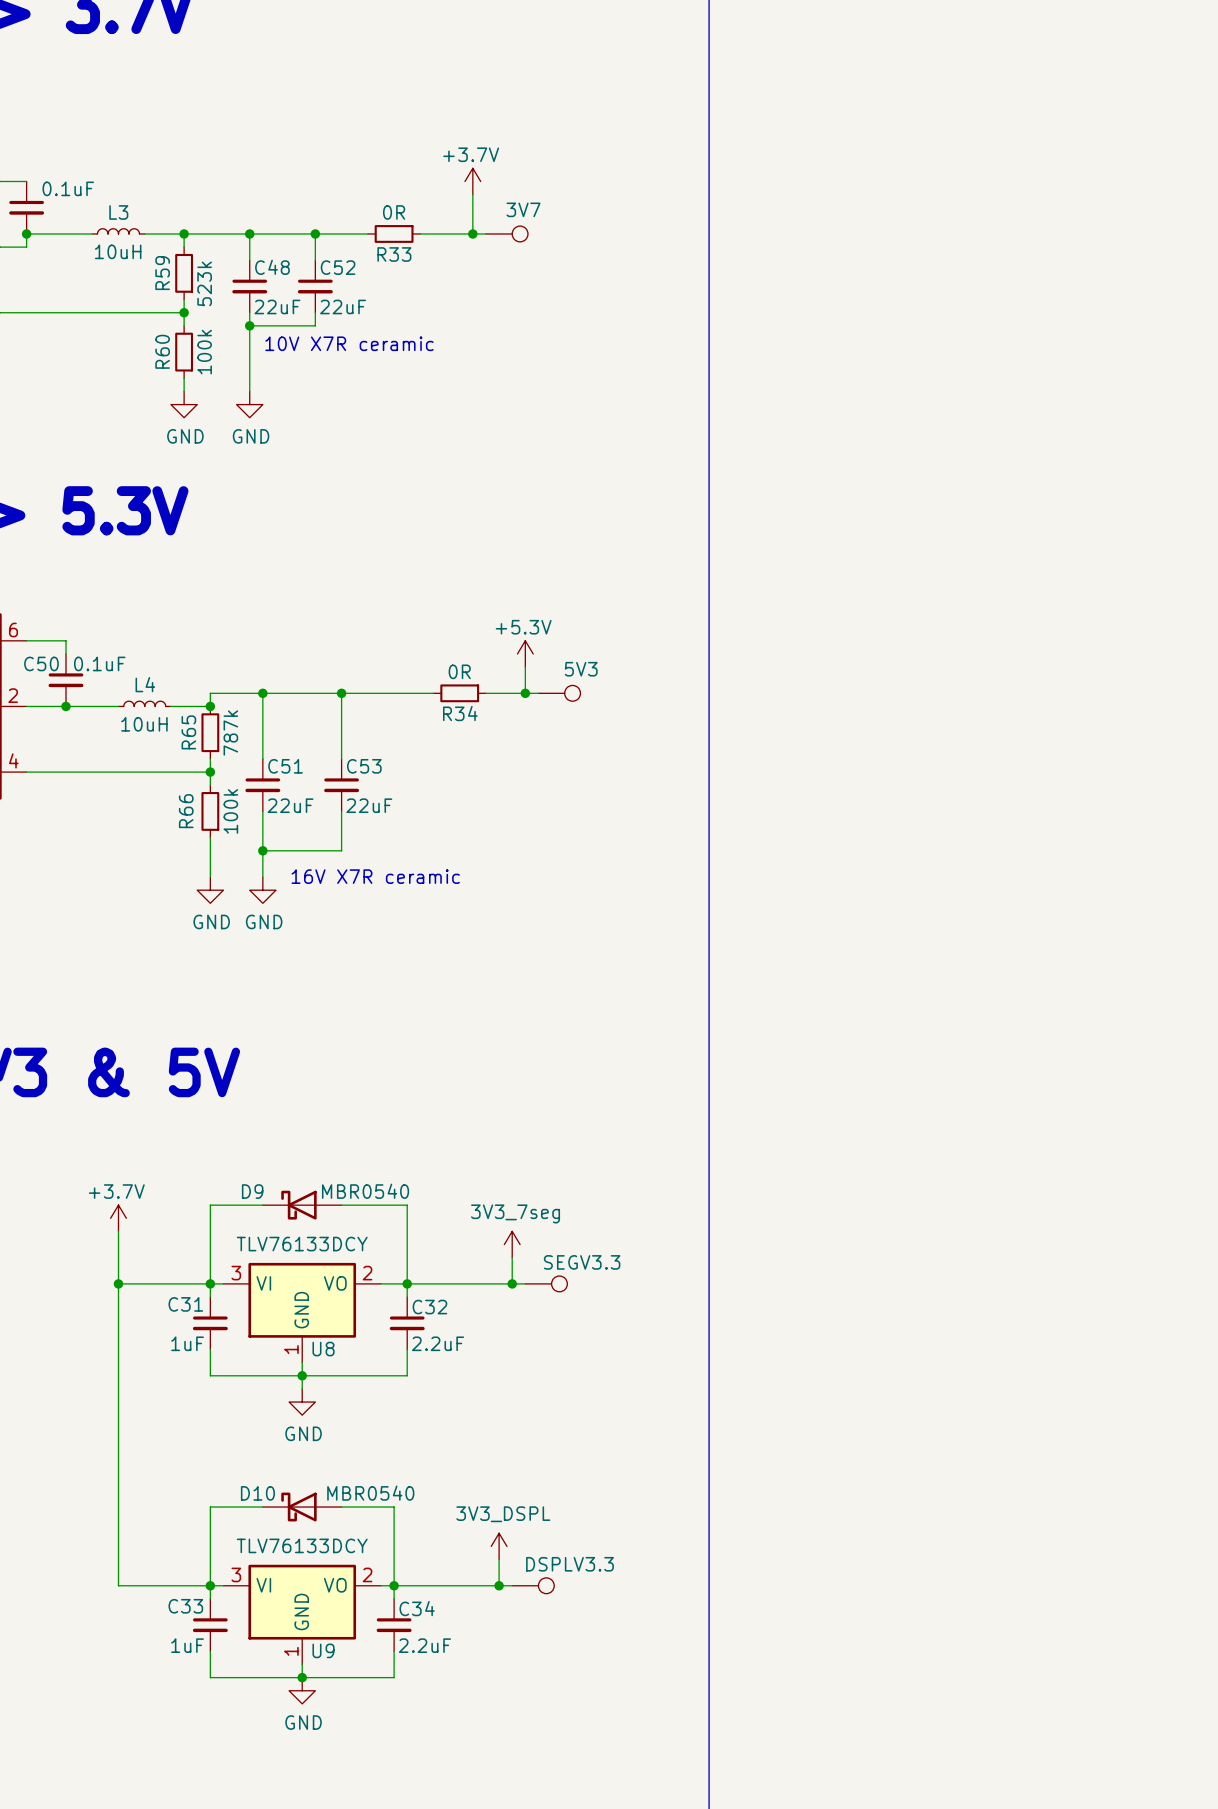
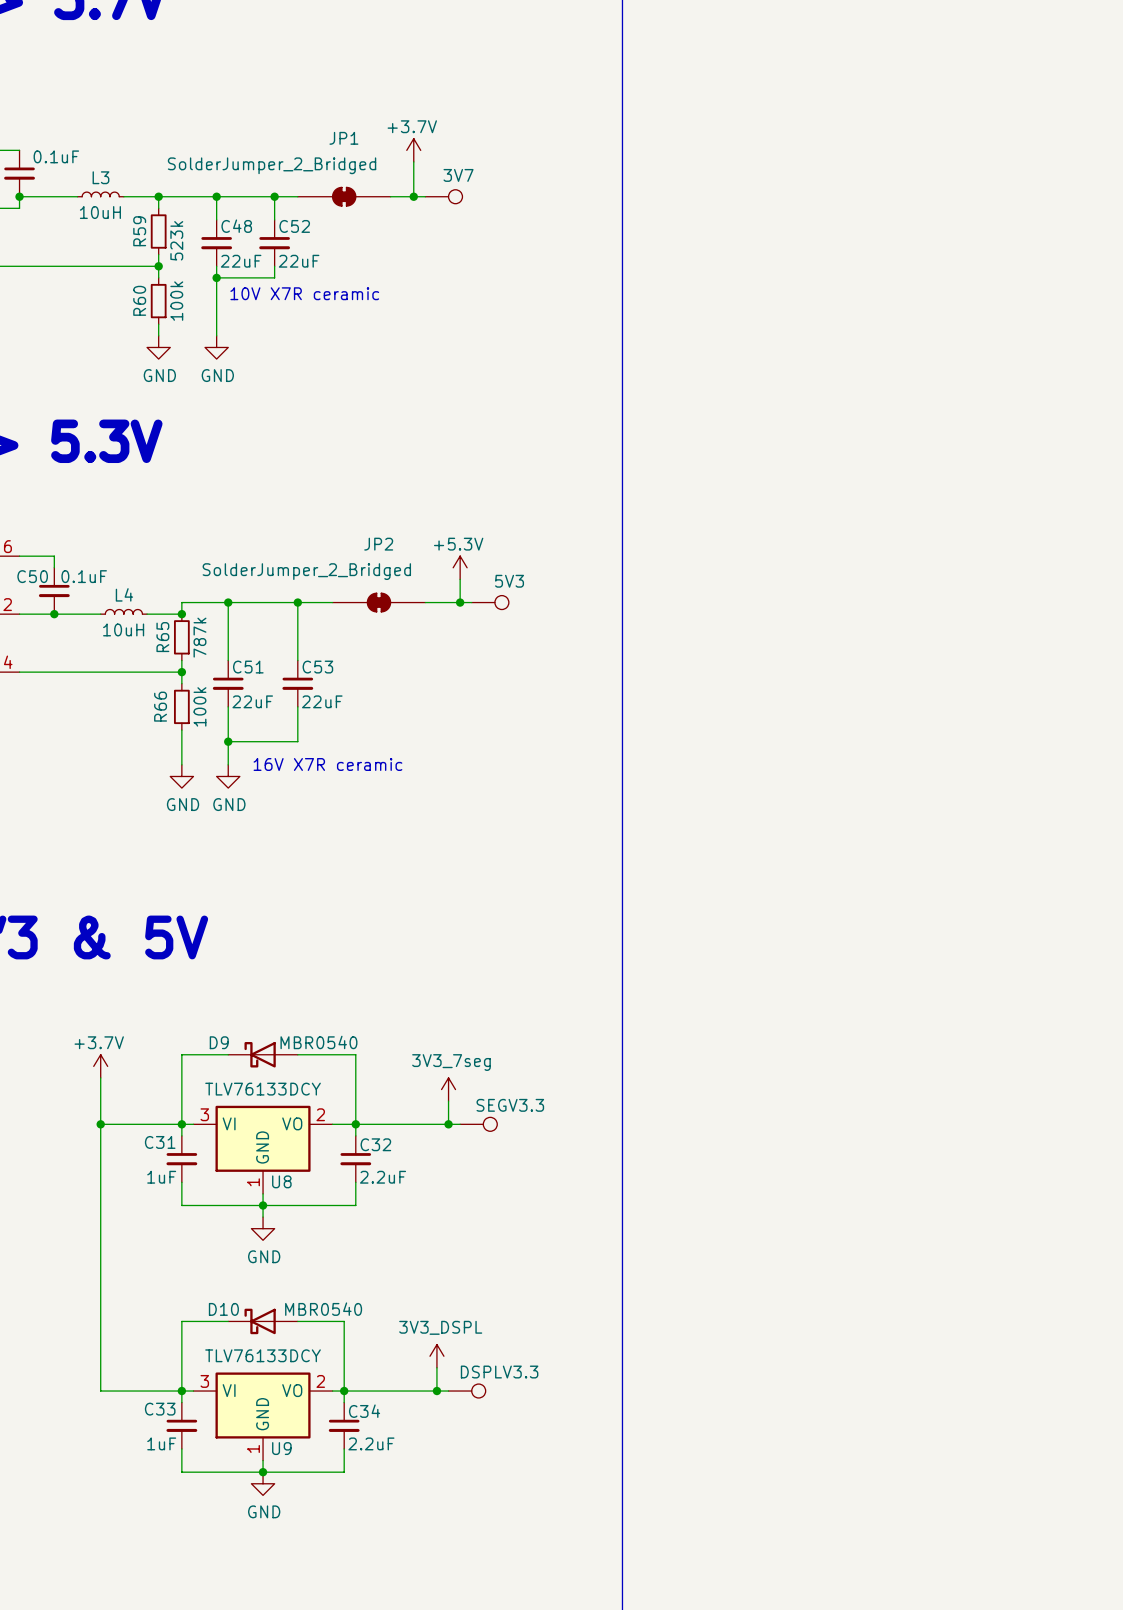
R33: 0R (394, 233) -> none
JP1: none -> SolderJumper_2_Bridged (344, 196)
JP2: none -> SolderJumper_2_Bridged (378, 602)
R34: 0R (459, 693) -> none

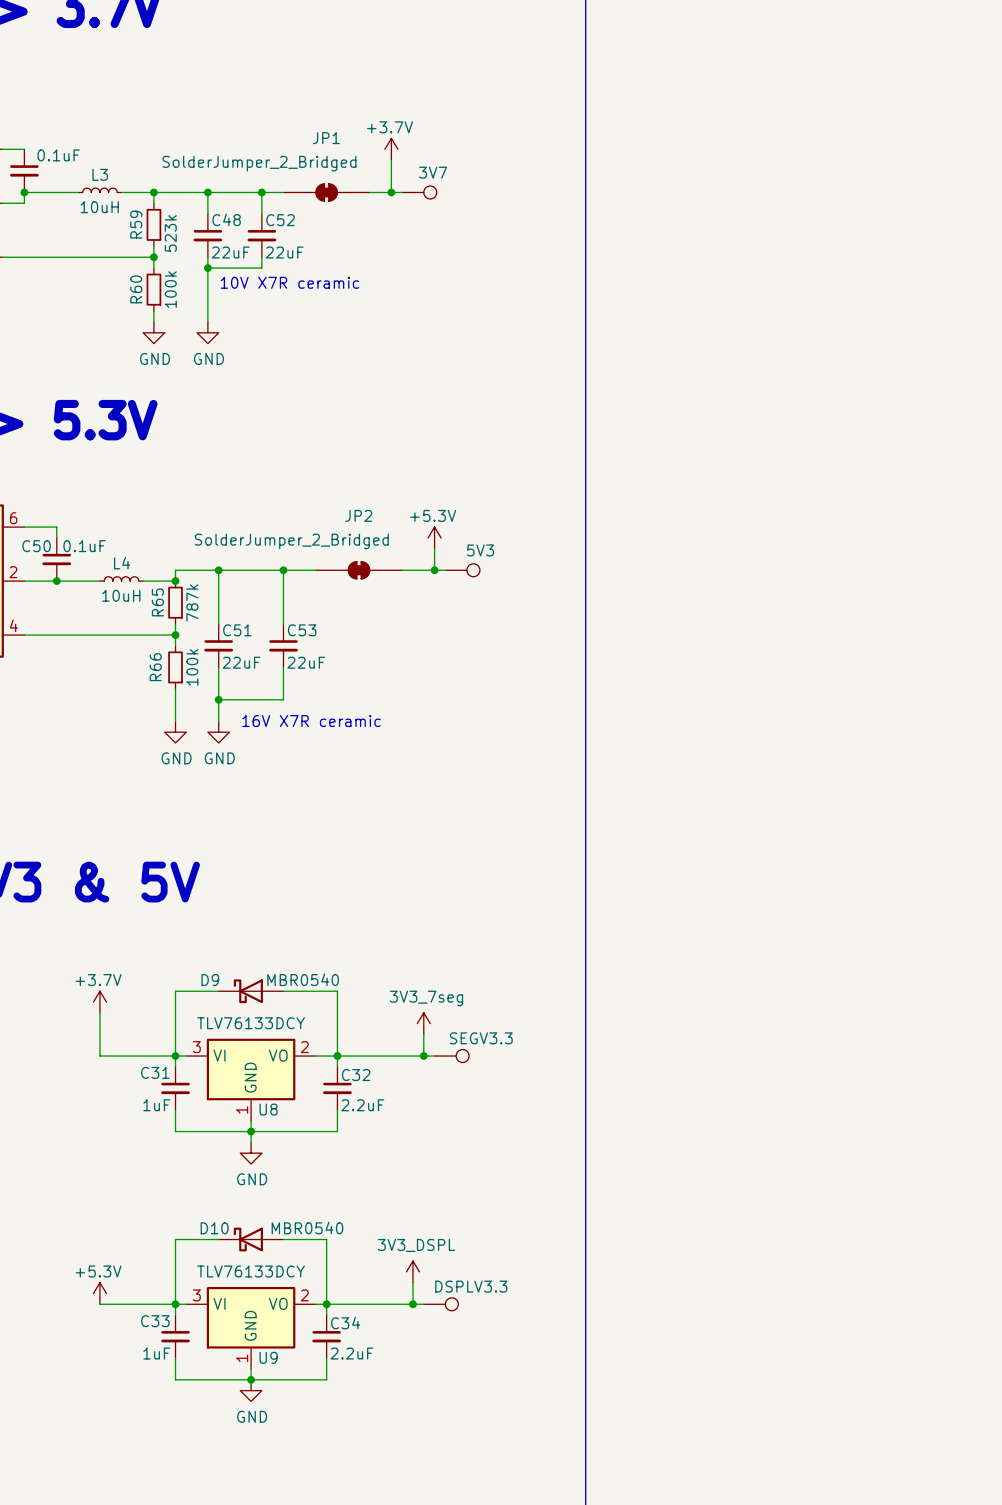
wire: (100, 1124) (100, 1391) -> none
junction: (100, 1124) -> none
power symbol: none -> +5.3V (99, 1293)

